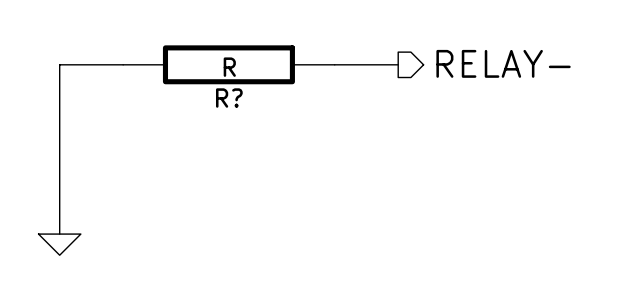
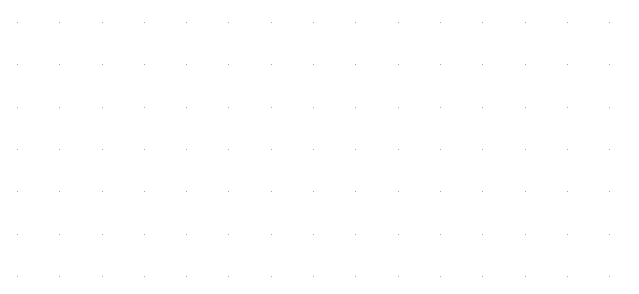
hierarchical label: RELAY- (503, 63) -> none
wire: (123, 64) (59, 64) (59, 234) -> none
R?: R (228, 64) -> none
wire: (334, 64) (398, 64) -> none
power symbol: (59, 244) -> none

